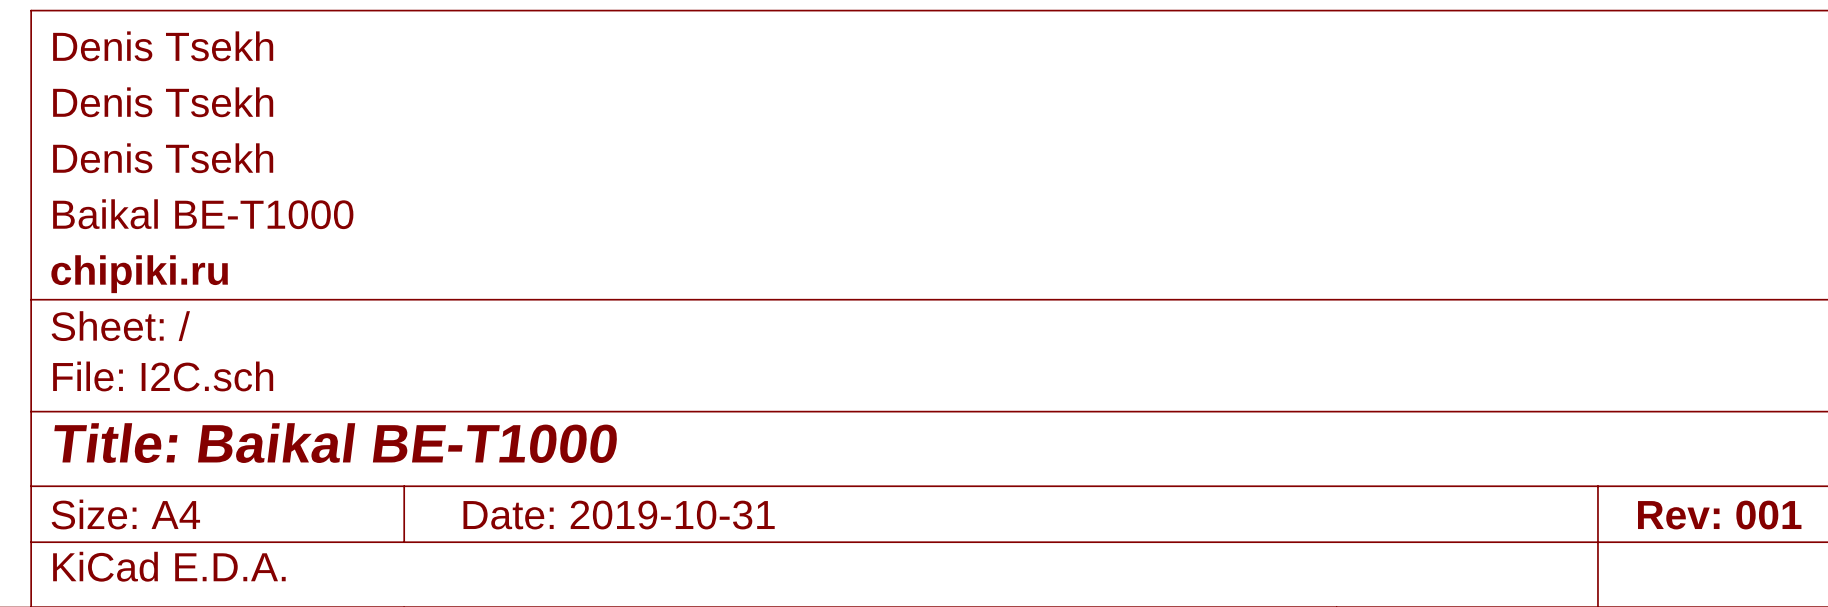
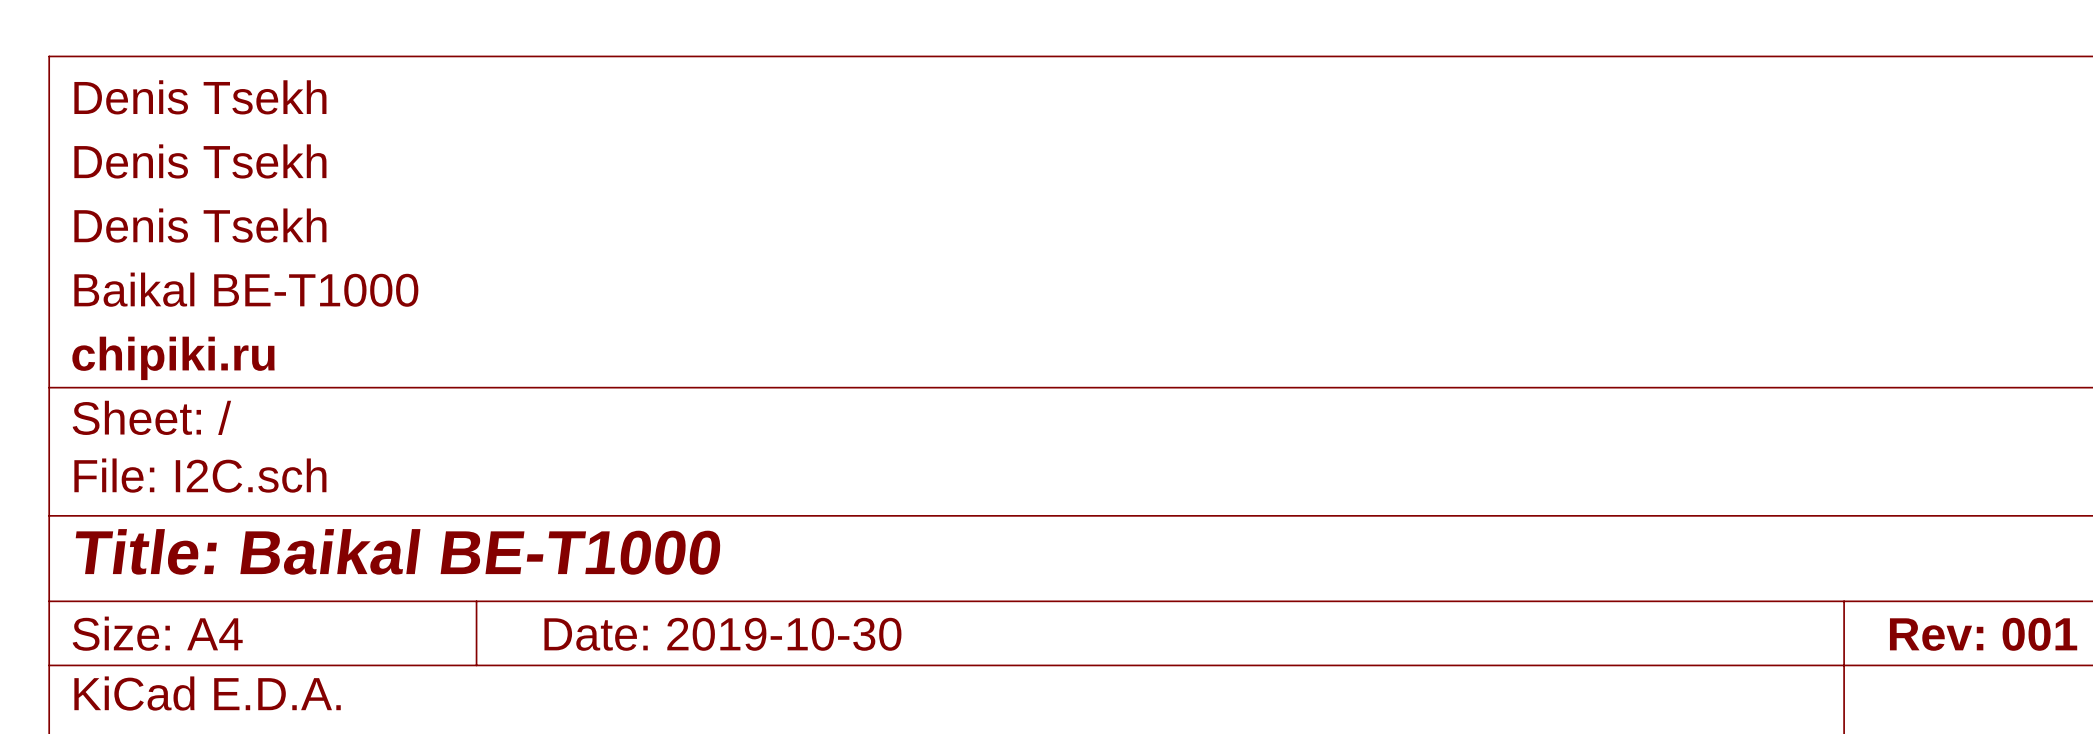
title block: Date: 2019-10-31 (619, 515) -> Date: 2019-10-30 (722, 634)

